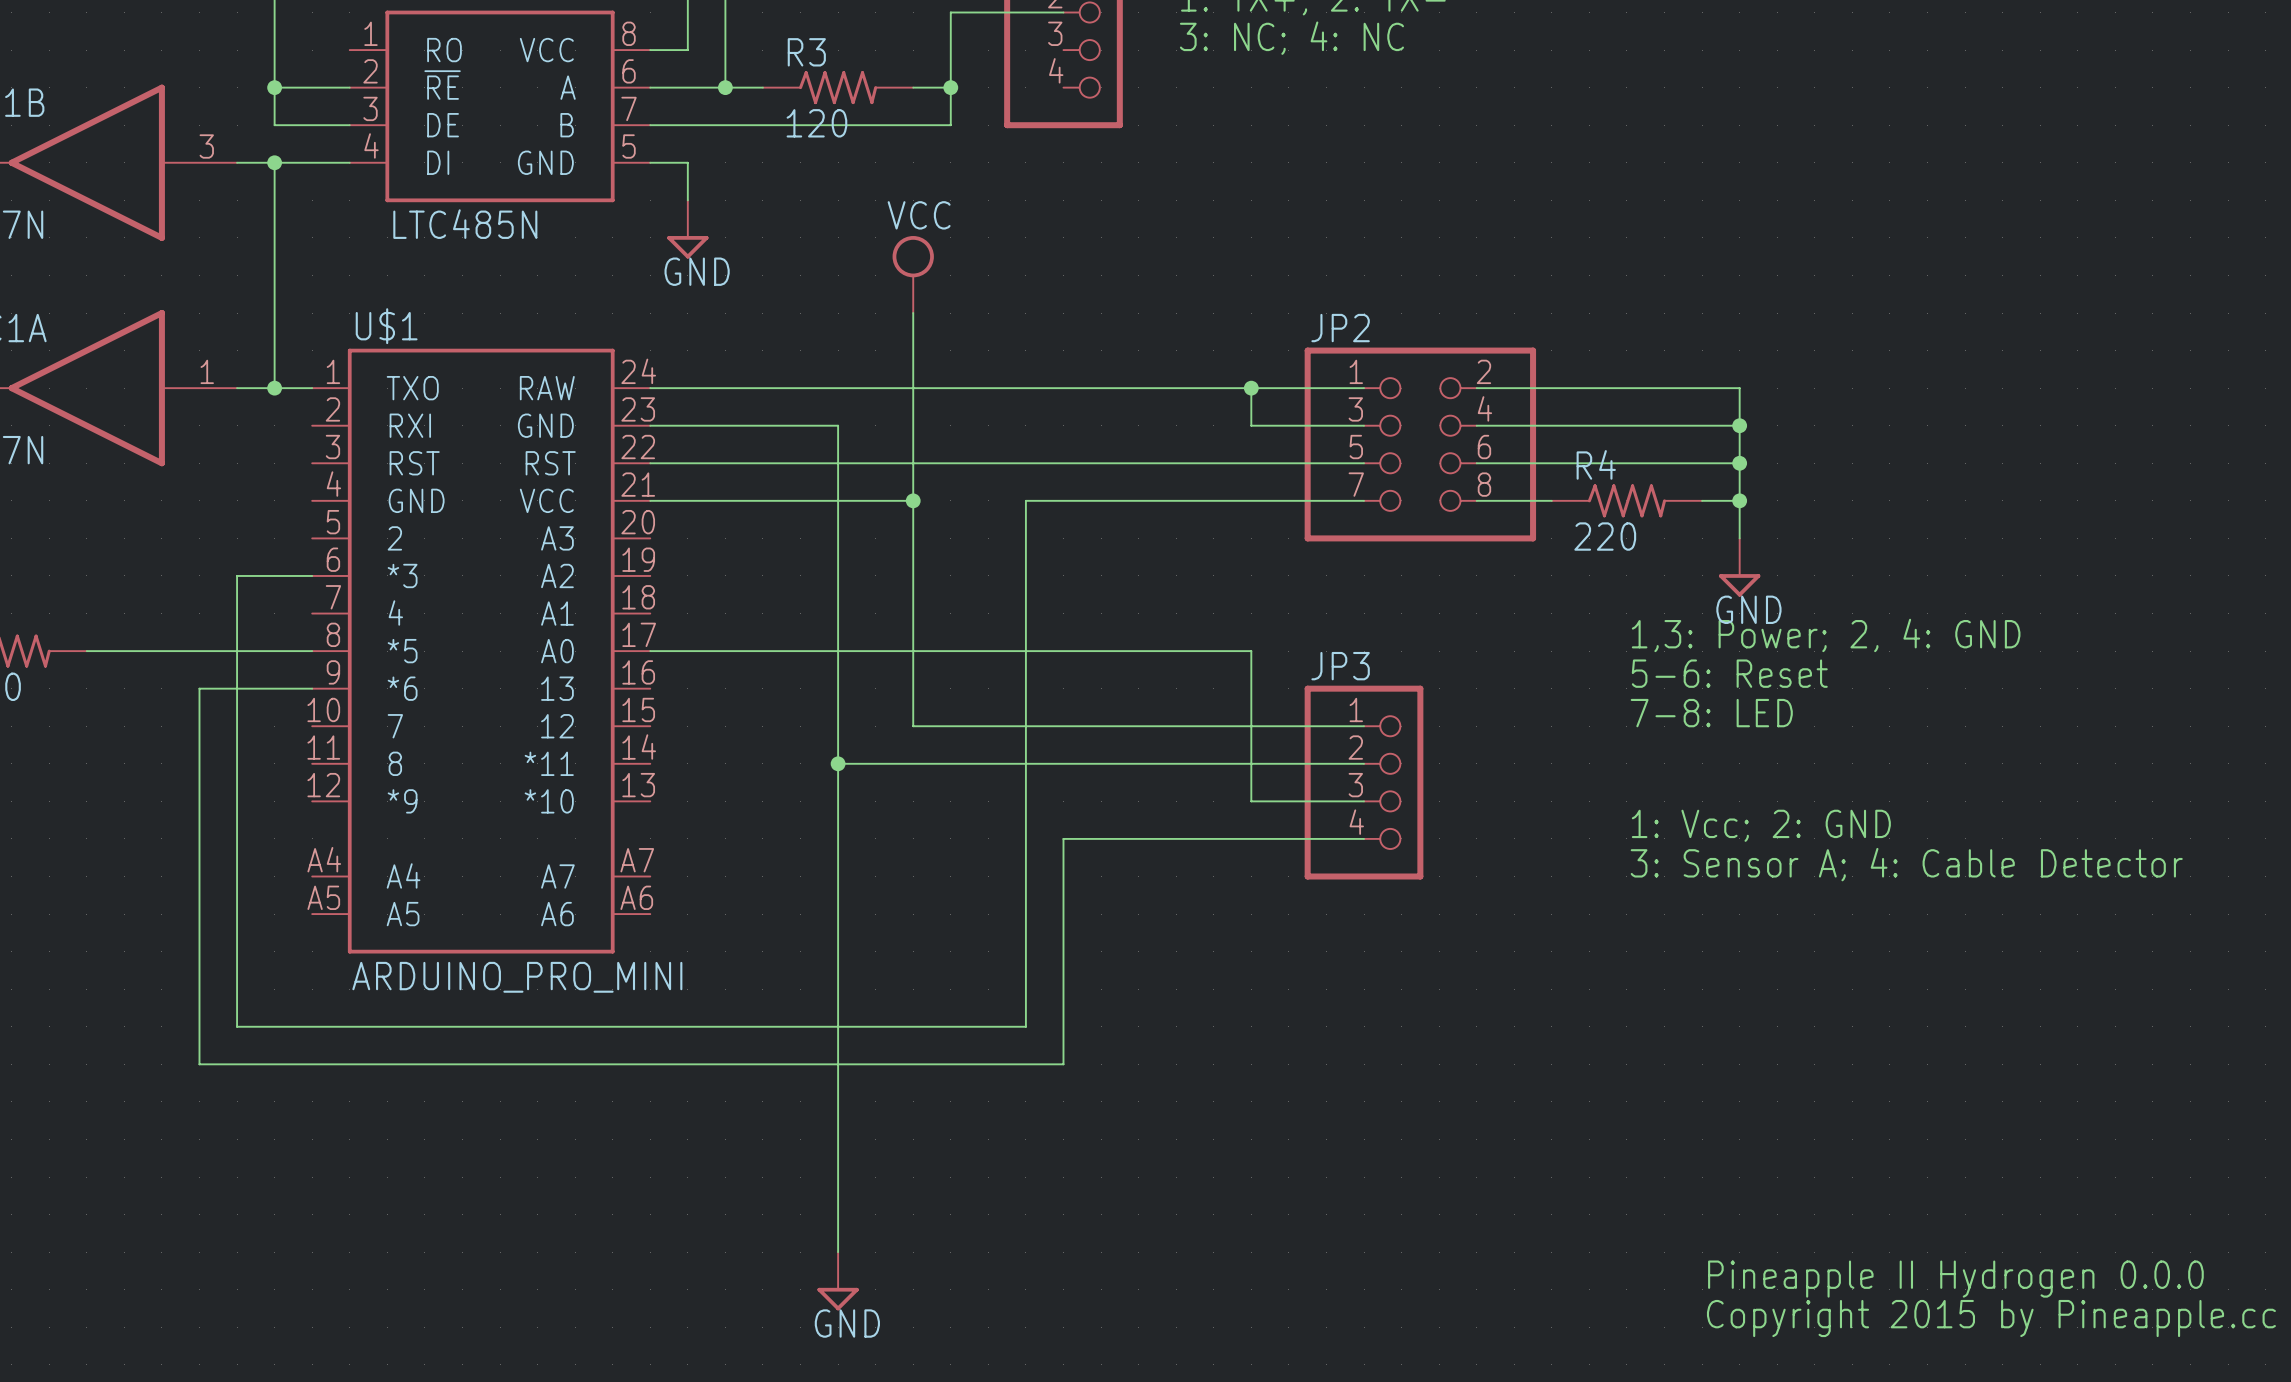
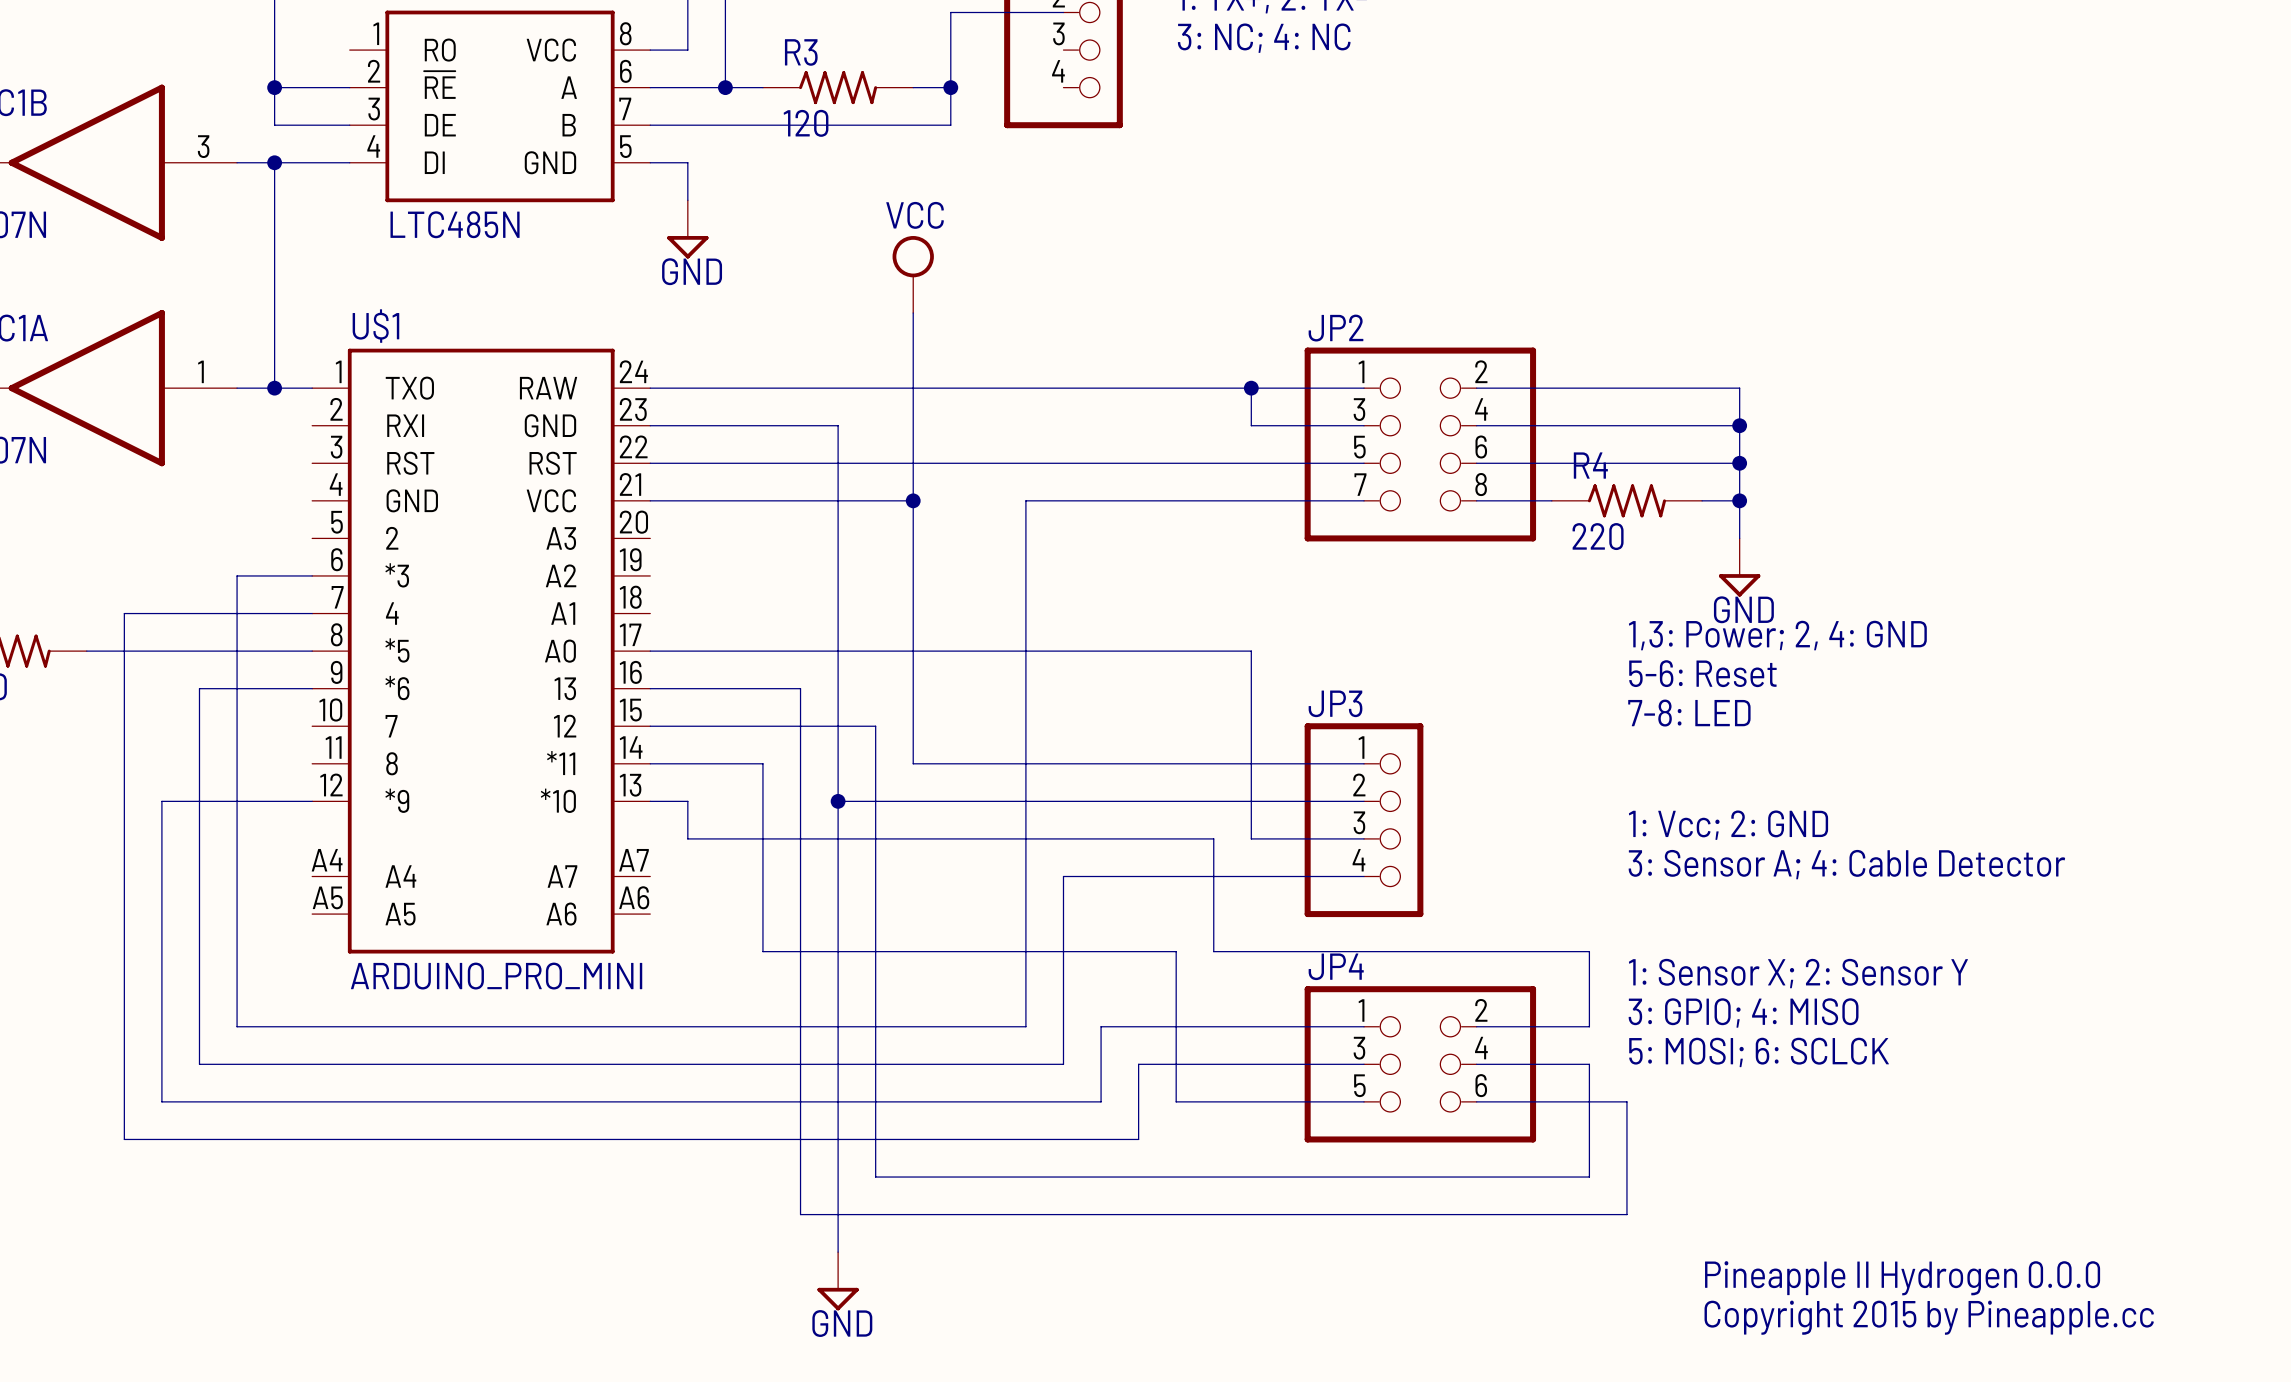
wire: none -> (312, 613) (124, 613) (124, 1139) (1138, 1139) (1138, 1064) (1364, 1064)
wire: none -> (650, 688) (800, 688) (800, 1214) (1626, 1214) (1626, 1101) (1476, 1101)
wire: none -> (650, 726) (875, 726) (875, 1177) (1589, 1177) (1589, 1064) (1476, 1064)
wire: (913, 726) (1364, 726) -> none
wire: none -> (650, 763) (762, 763) (762, 951) (1176, 951) (1176, 1101) (1364, 1101)
wire: (838, 763) (913, 763) -> (913, 726) (913, 763)
junction position: (838, 763) -> (838, 801)
JP3 position: (1364, 782) -> (1364, 820)
wire: none -> (312, 801) (161, 801) (161, 1101) (1101, 1101) (1101, 1026) (1364, 1026)
wire: none -> (650, 801) (687, 801) (687, 838) (1063, 838)
wire: none -> (838, 801) (1251, 801) (1251, 838)
wire: (1063, 838) (1063, 876) -> (1364, 876) (1063, 876)
wire: (1213, 838) (1251, 838) -> (1213, 838) (1213, 951) (1589, 951) (1589, 1026) (1476, 1026)
text: none -> 1: Sensor X; 2: Sensor Y (1798, 973)
text: none -> 3: GPIO; 4: MISO (1743, 1012)
text: none -> 5: MOSI; 6: SCLCK (1759, 1052)
JP4: none -> (1420, 1064)

